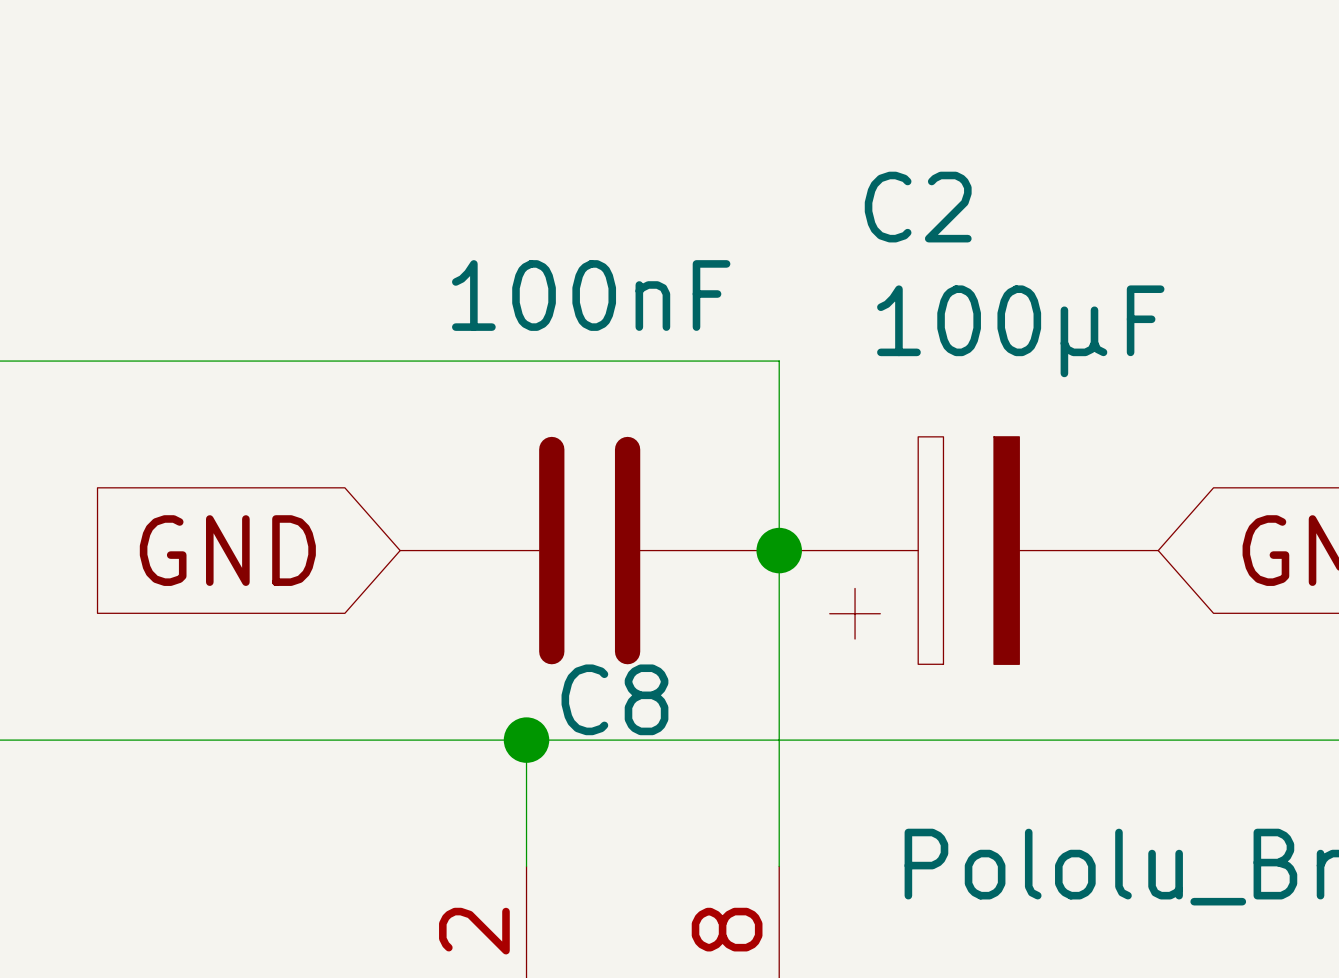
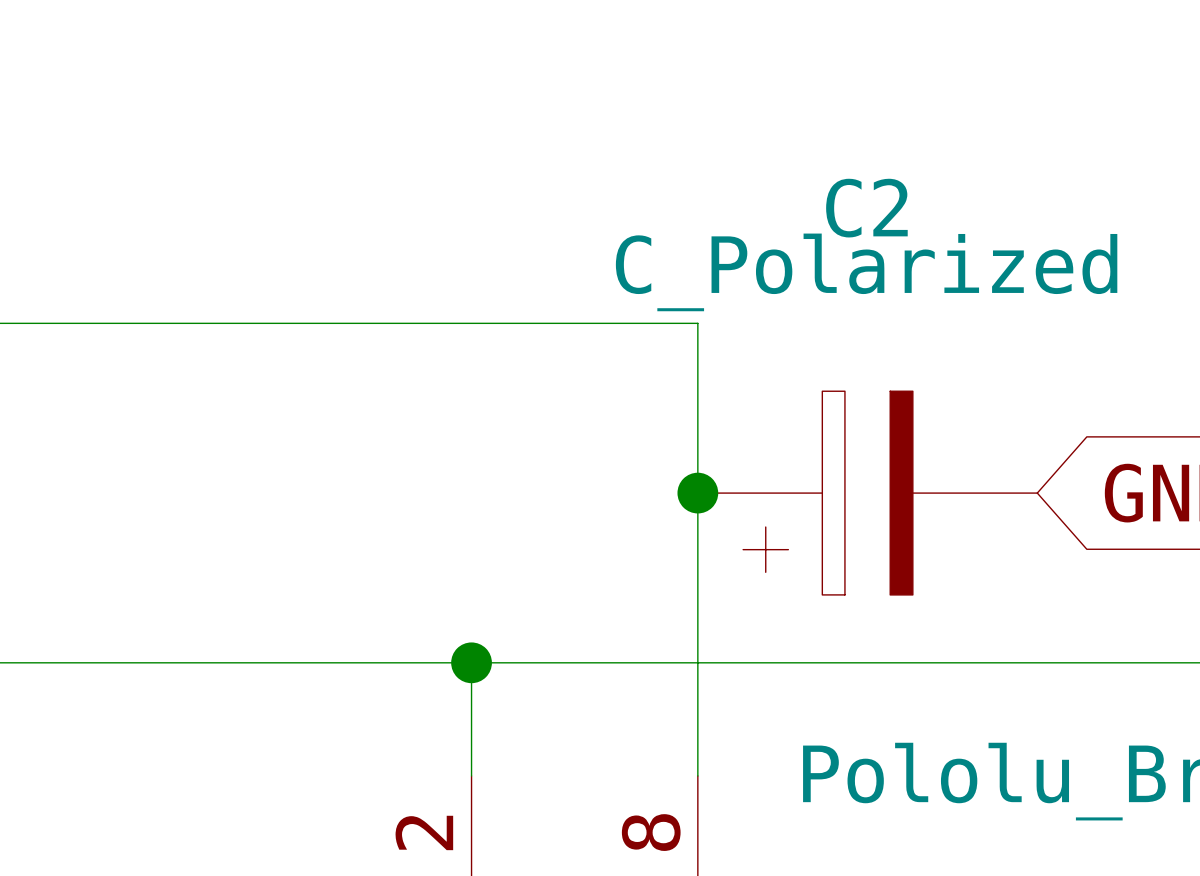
C2 name position: C2 (918, 207) -> C2 (866, 208)
C2 value: 100µF (1020, 331) -> C_Polarized (866, 272)
global label: GND (227, 550) -> none
C8: 100nF (589, 550) -> none

